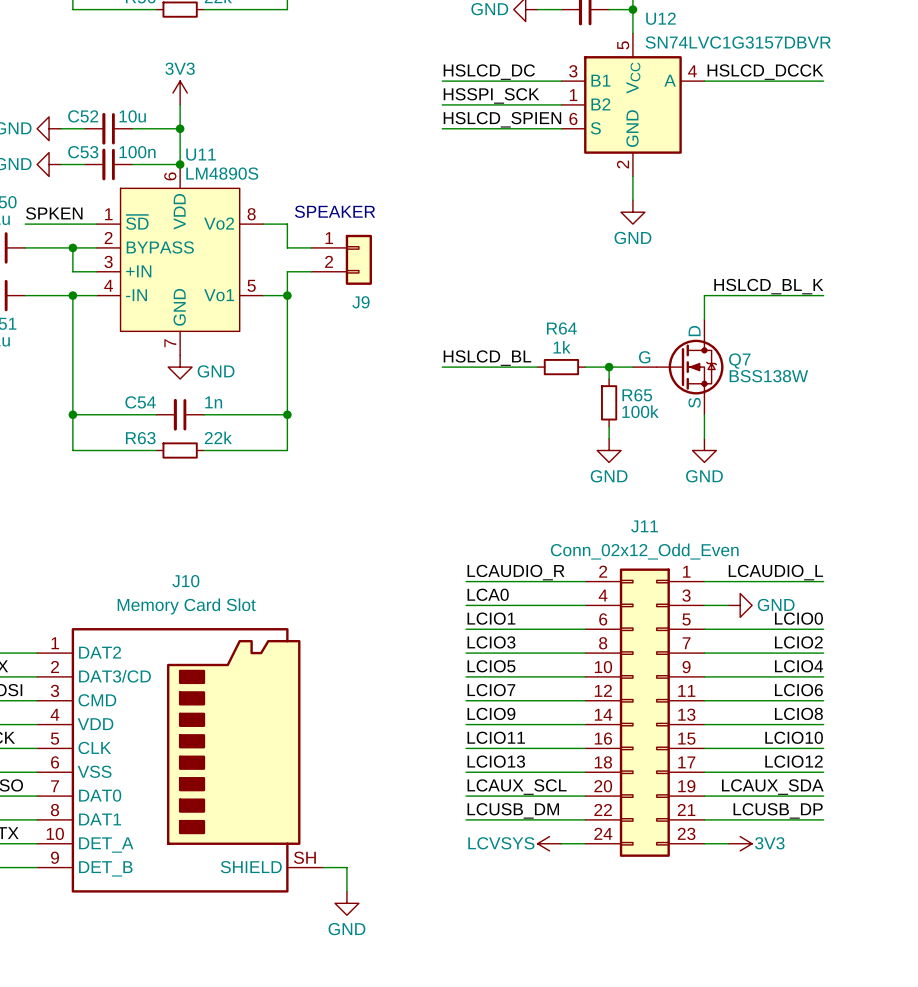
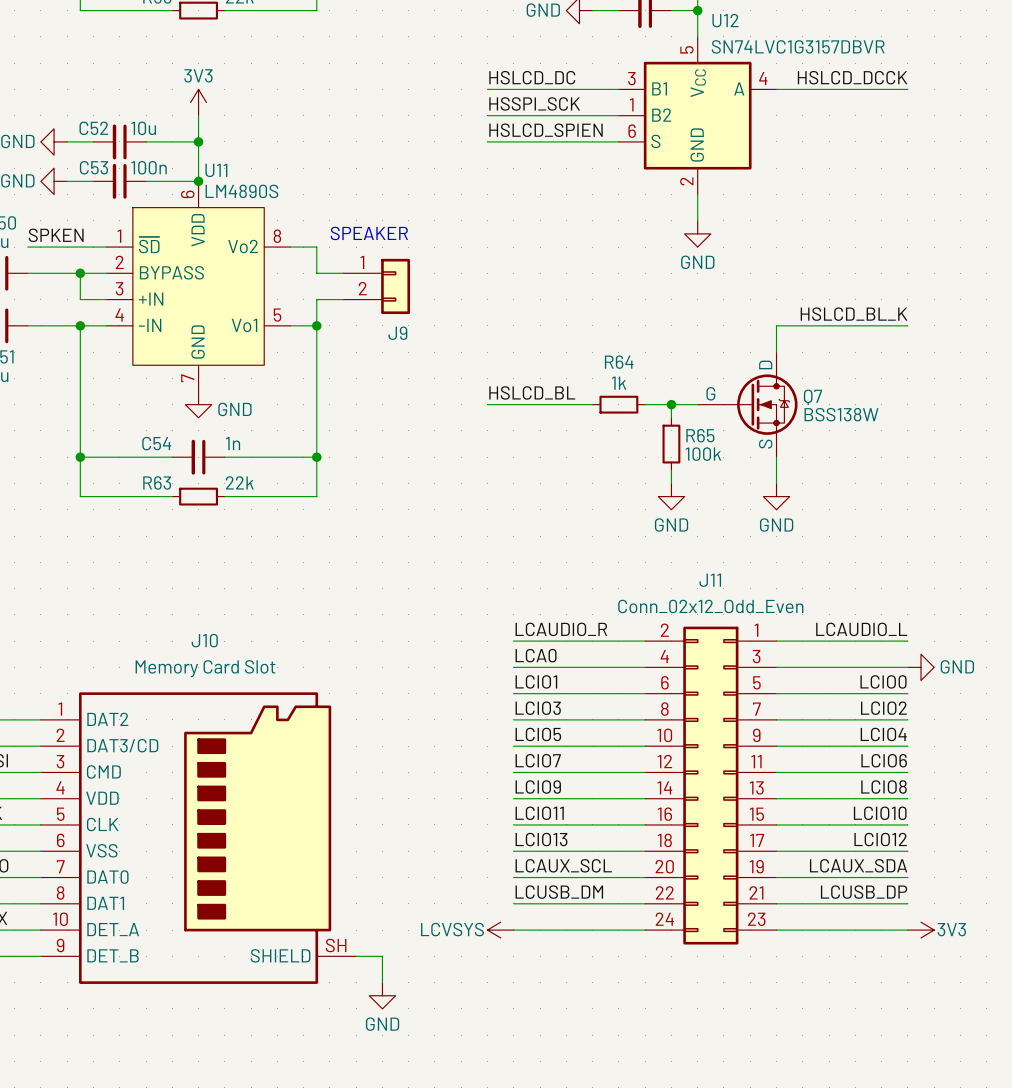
wire: none -> (802, 667) (907, 667)
power symbol position: GND (740, 605) -> GND (921, 667)
wire: none -> (513, 930) (618, 930)
power symbol position: LCVSYS (549, 843) -> LCVSYS (500, 930)
wire: none -> (802, 930) (907, 930)
power symbol position: 3V3 (740, 843) -> 3V3 (921, 930)

